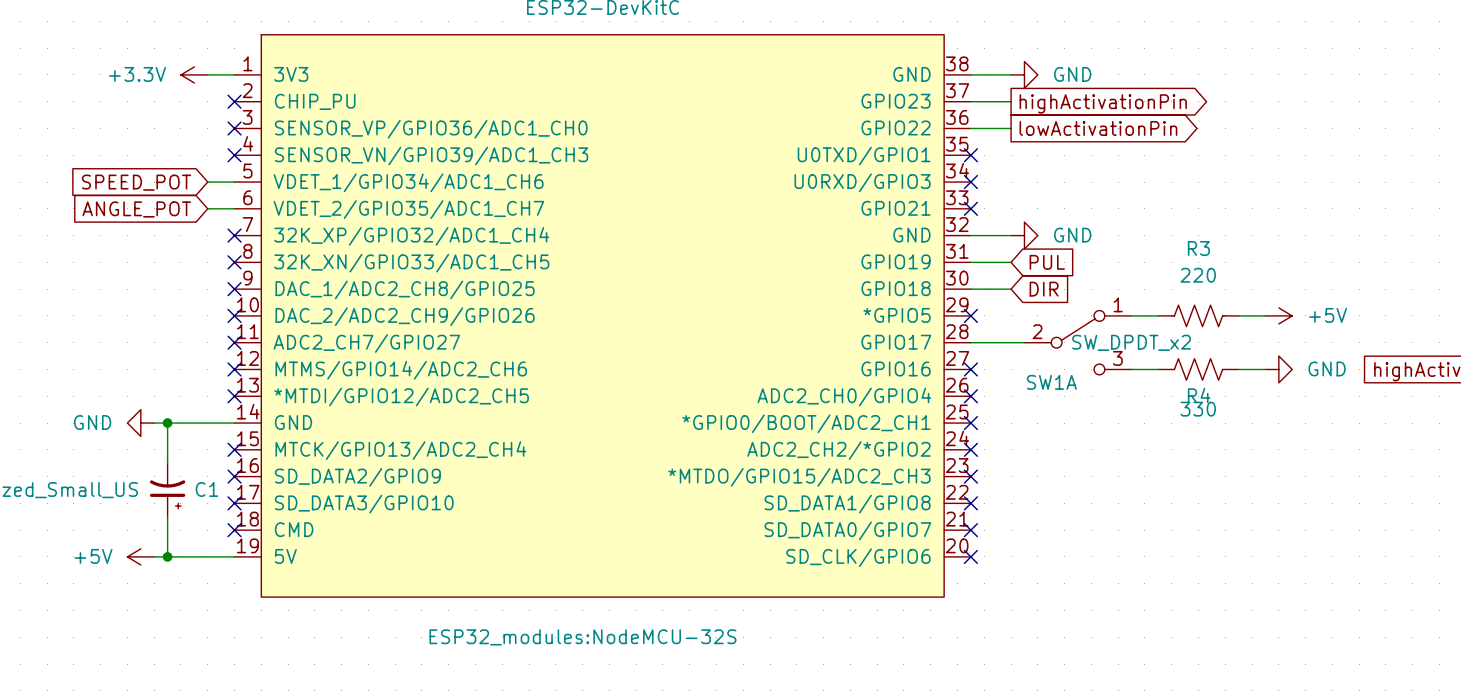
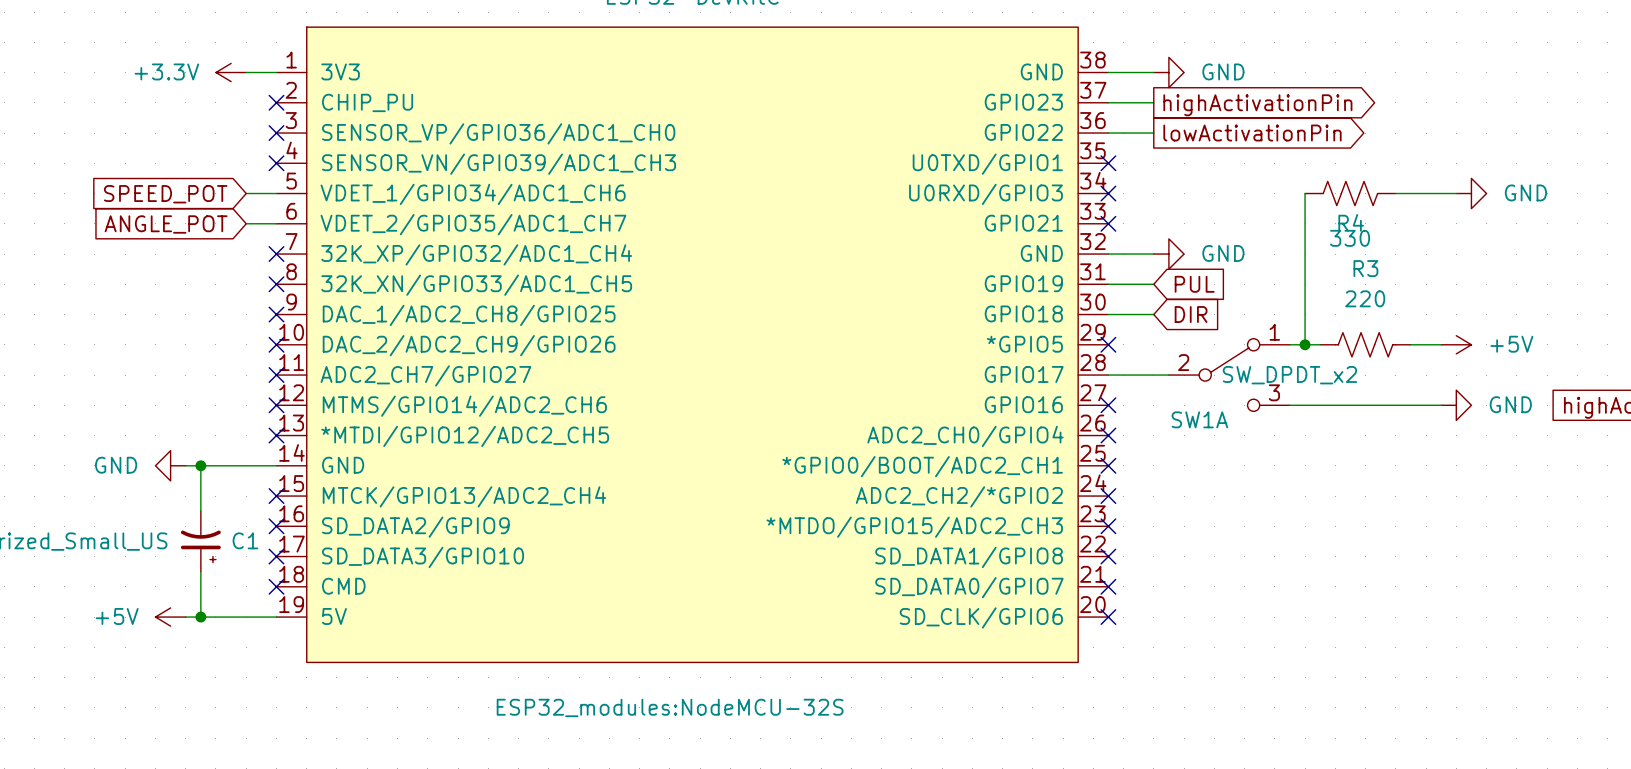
wire: none -> (1305, 193) (1305, 344)
wire: none -> (1395, 193) (1456, 193)
power symbol: none -> GND (1471, 193)
junction: none -> (1305, 344)
wire: none -> (1320, 405) (1410, 405)
R4 position: (1198, 369) -> (1350, 193)

